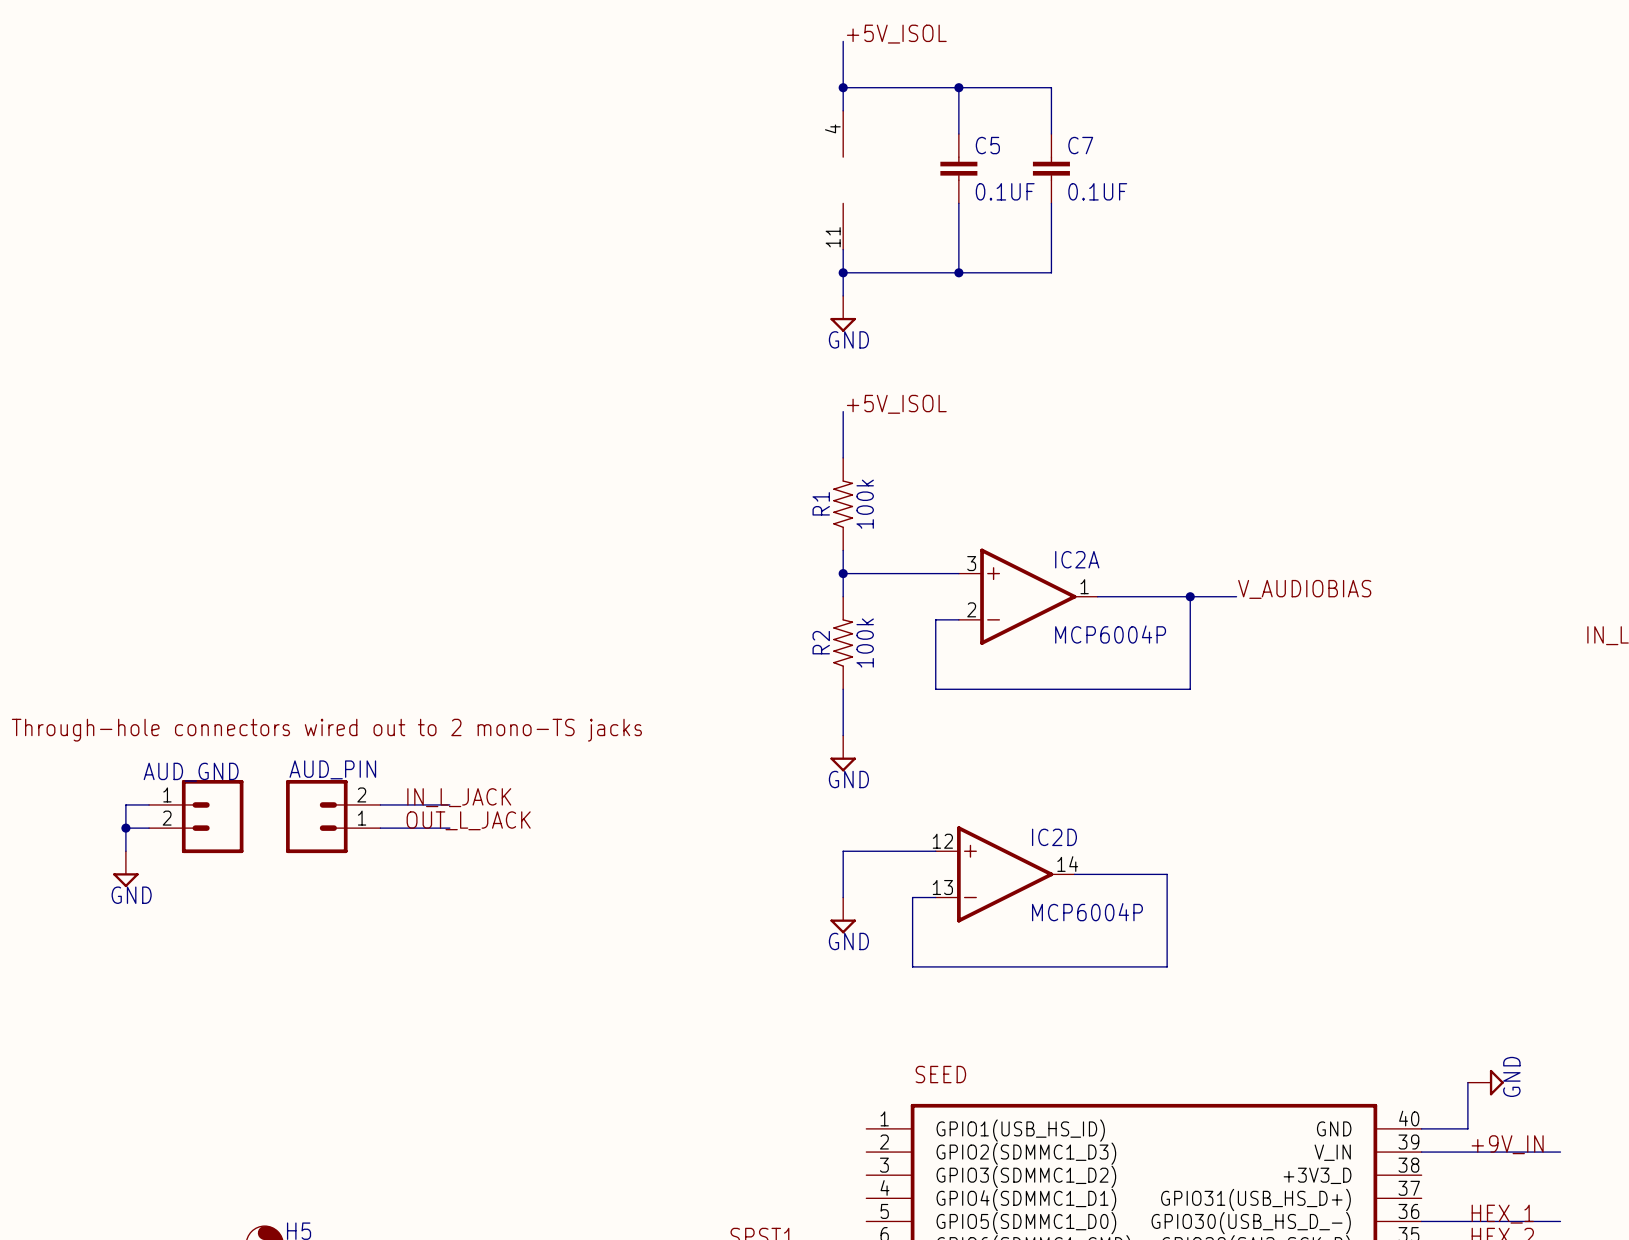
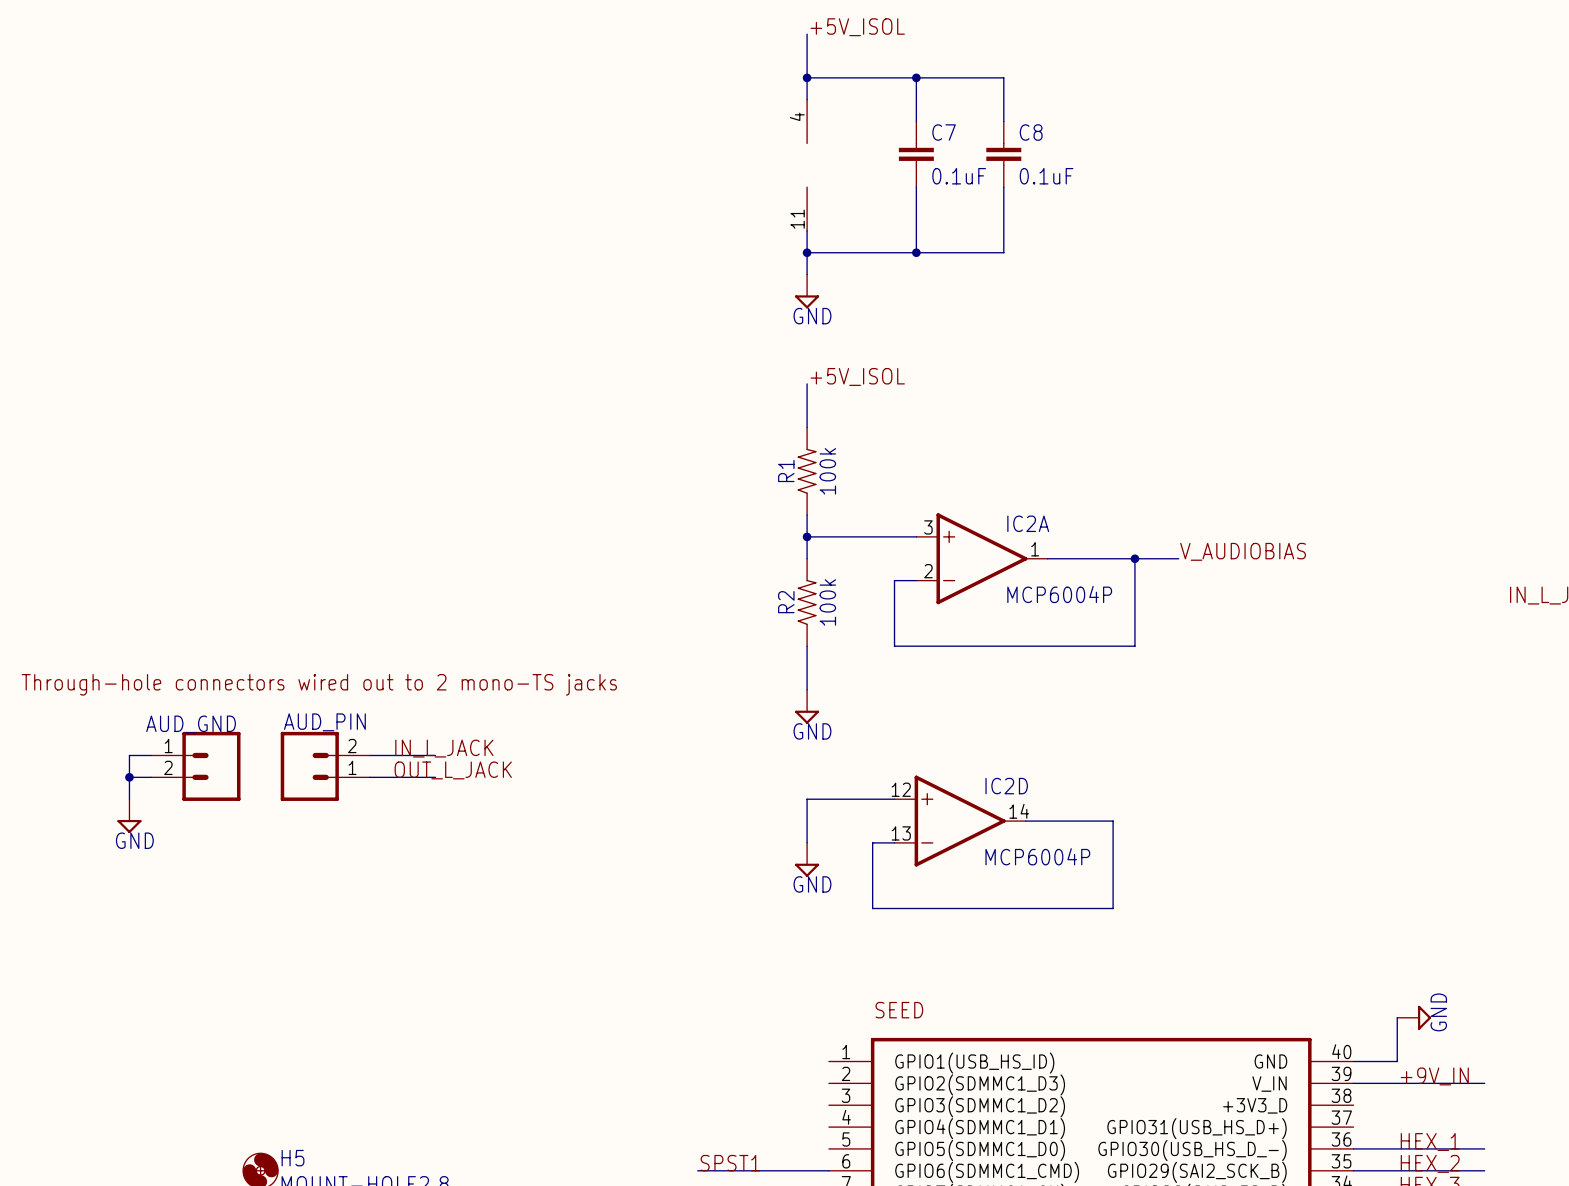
C5 name: C5 (987, 145) -> C7 (944, 132)
C7 name: C7 (1080, 145) -> C8 (1031, 132)
C5 value: 0.1UF (1005, 191) -> 0.1uF (959, 176)
C7 value: 0.1UF (1097, 191) -> 0.1uF (1046, 176)

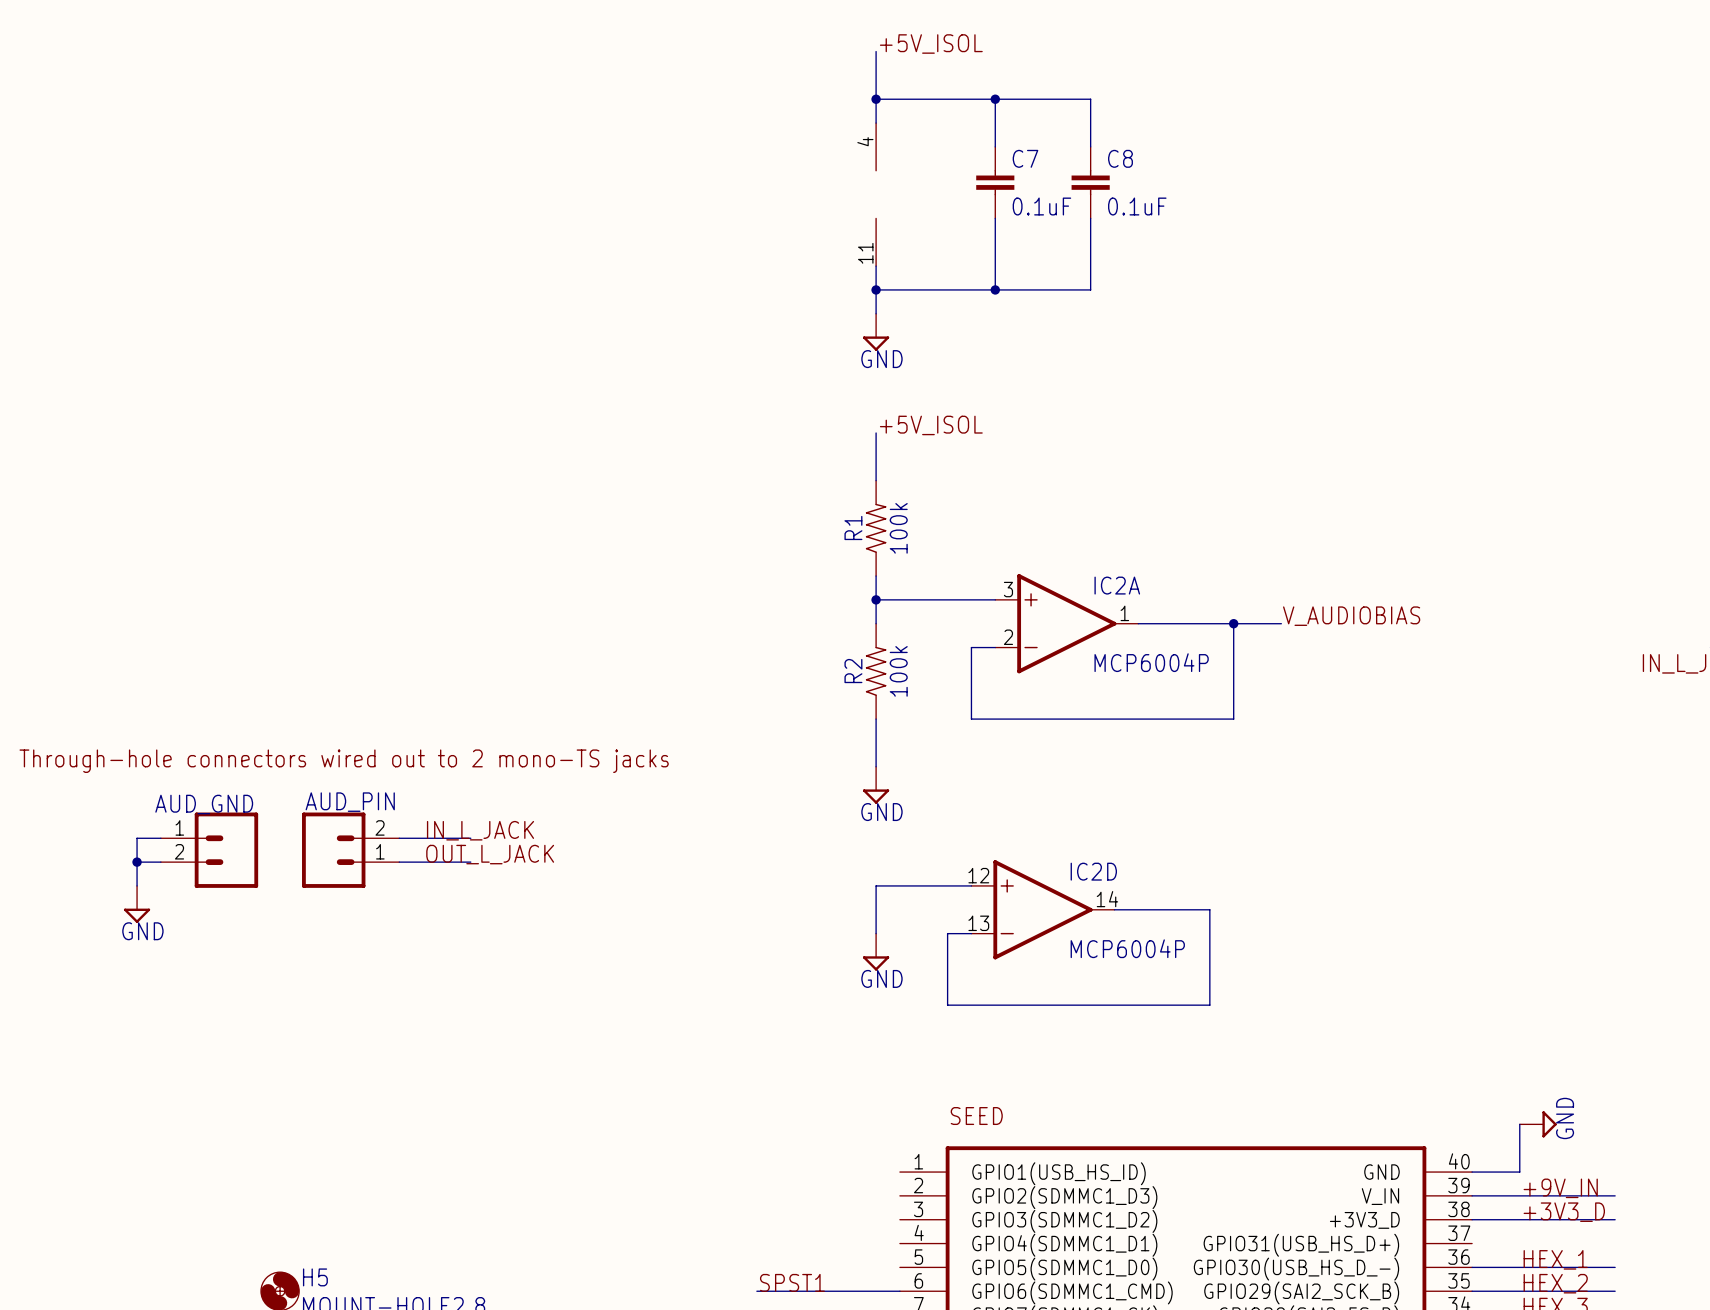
label: none -> +3V3_D (1564, 1212)
wire: none -> (1472, 1219) (1615, 1219)

